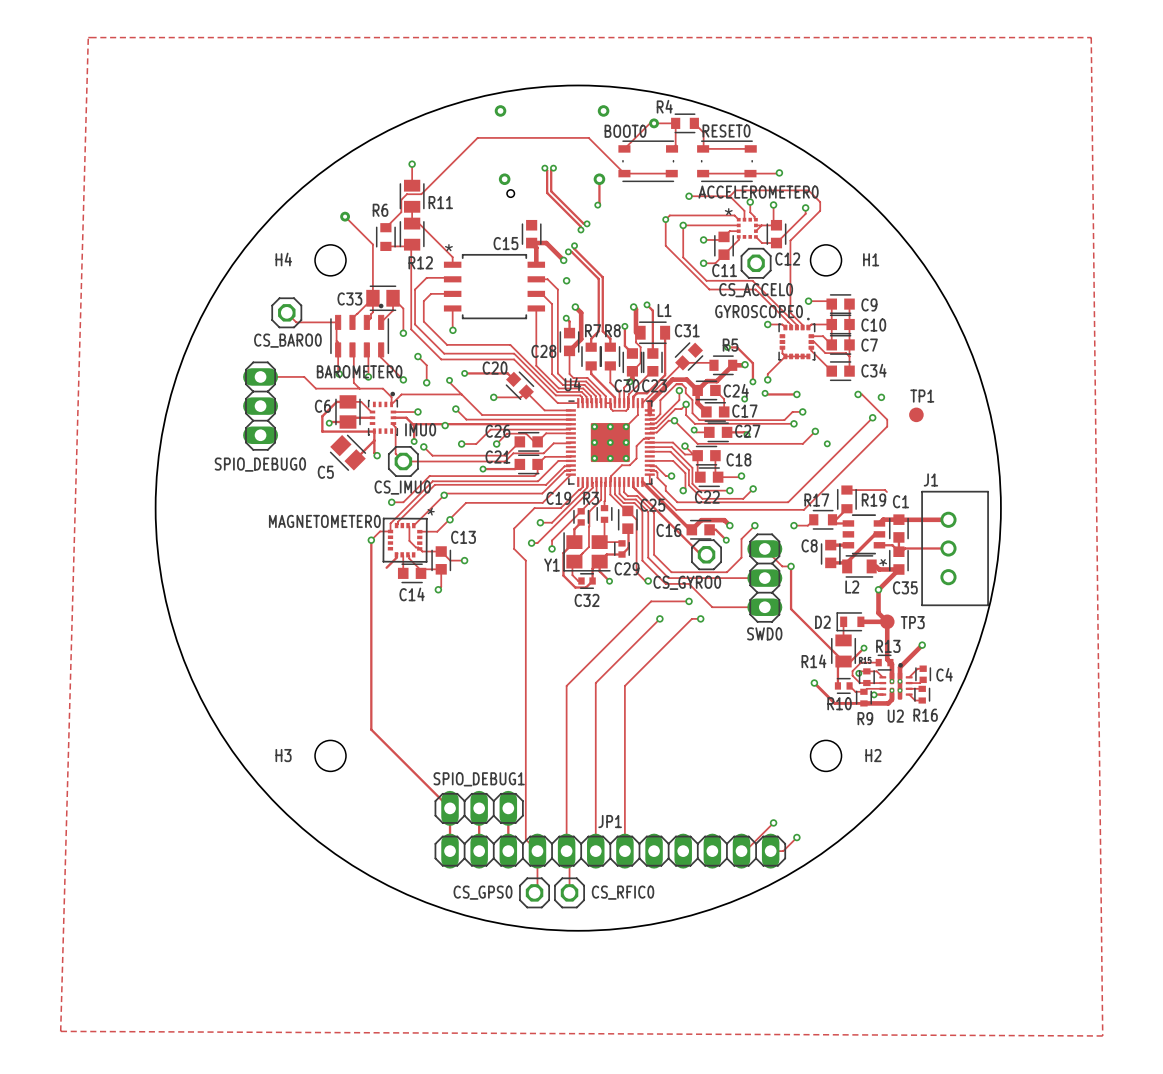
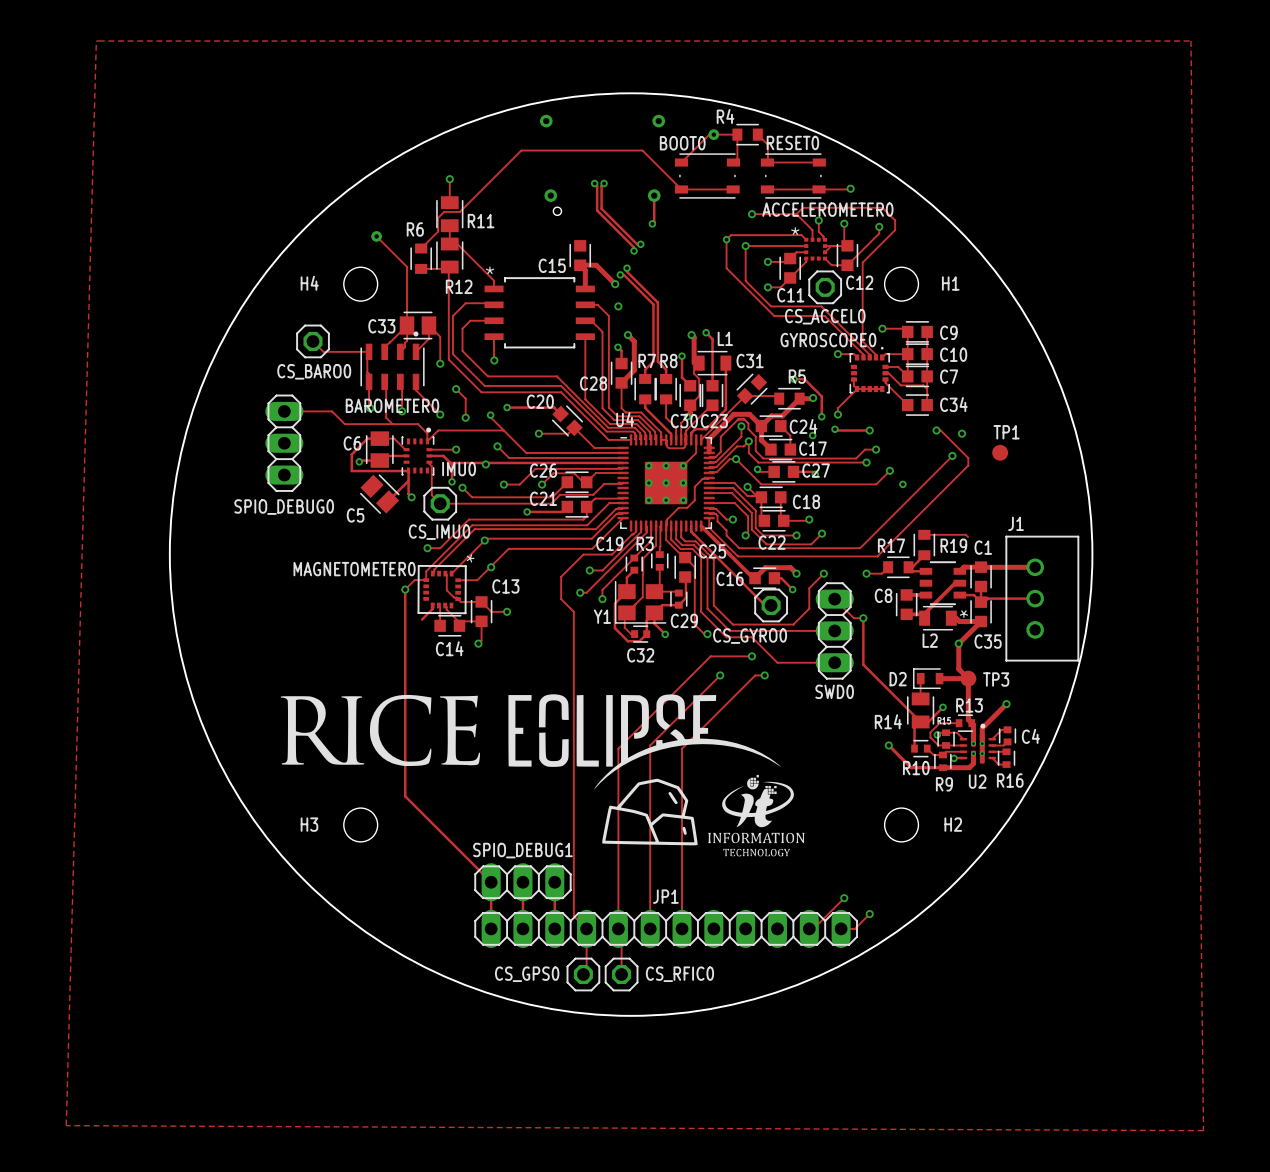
drawing: none -> [280, 694, 805, 857]

